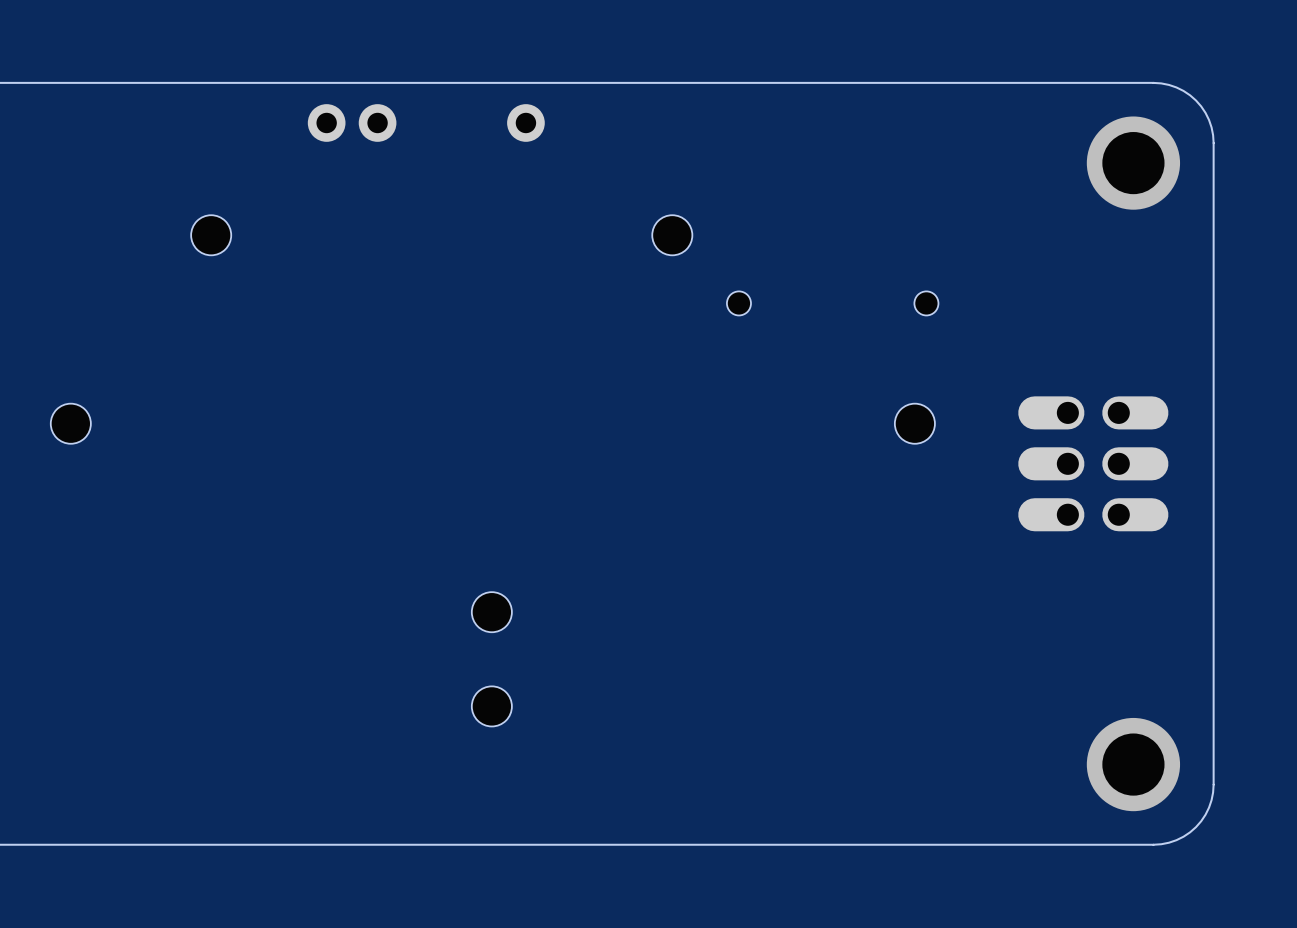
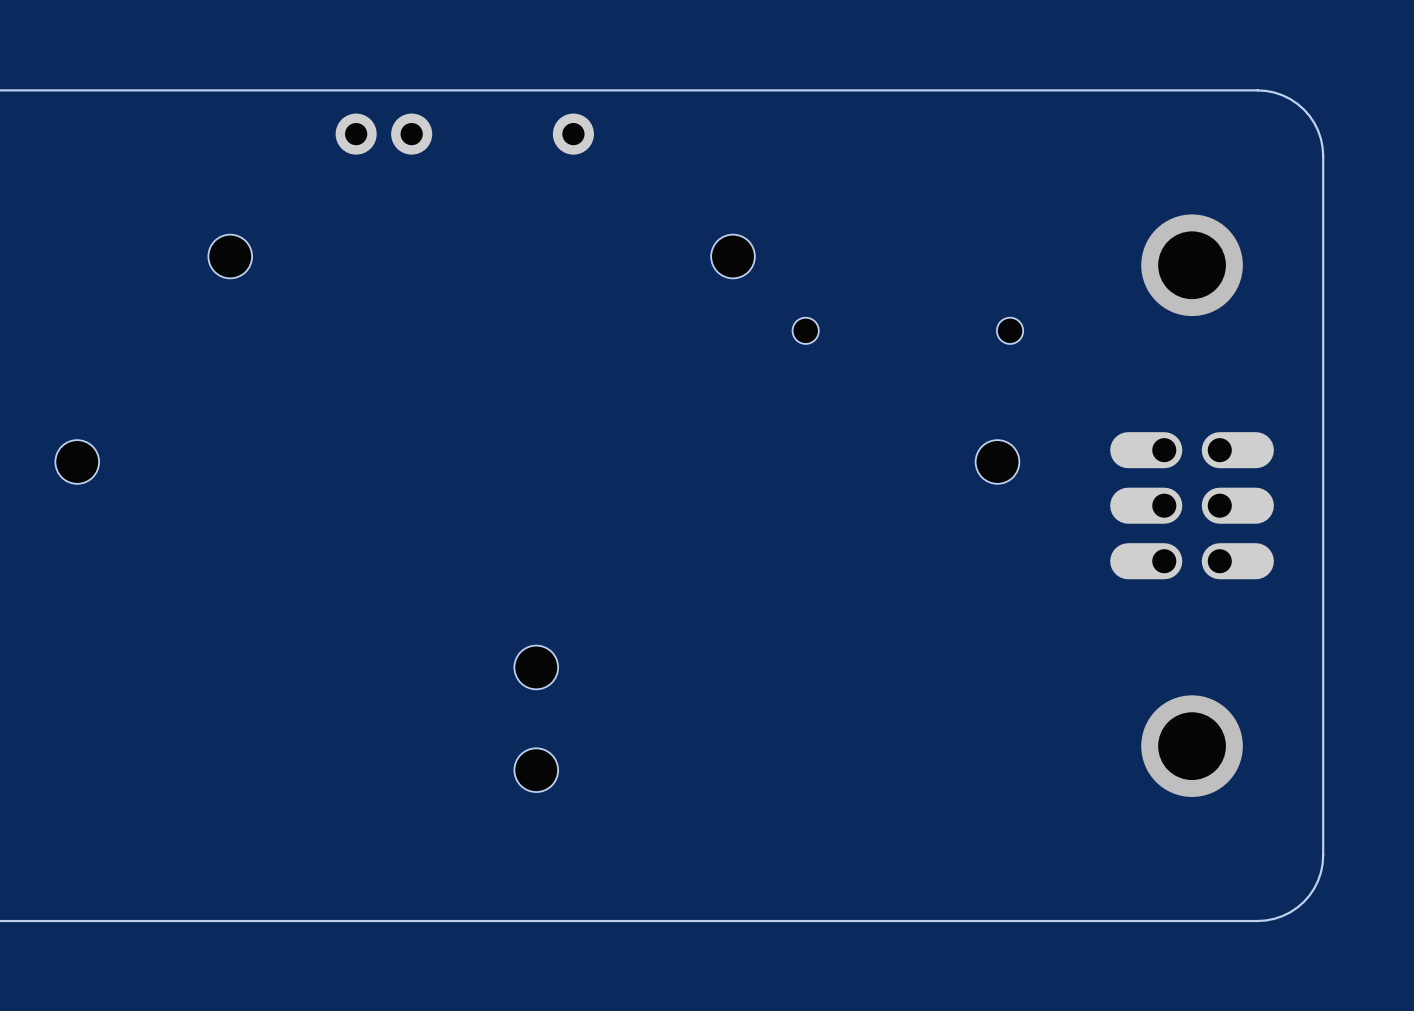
via position: (1133, 163) -> (1192, 265)
via position: (1133, 764) -> (1192, 746)

